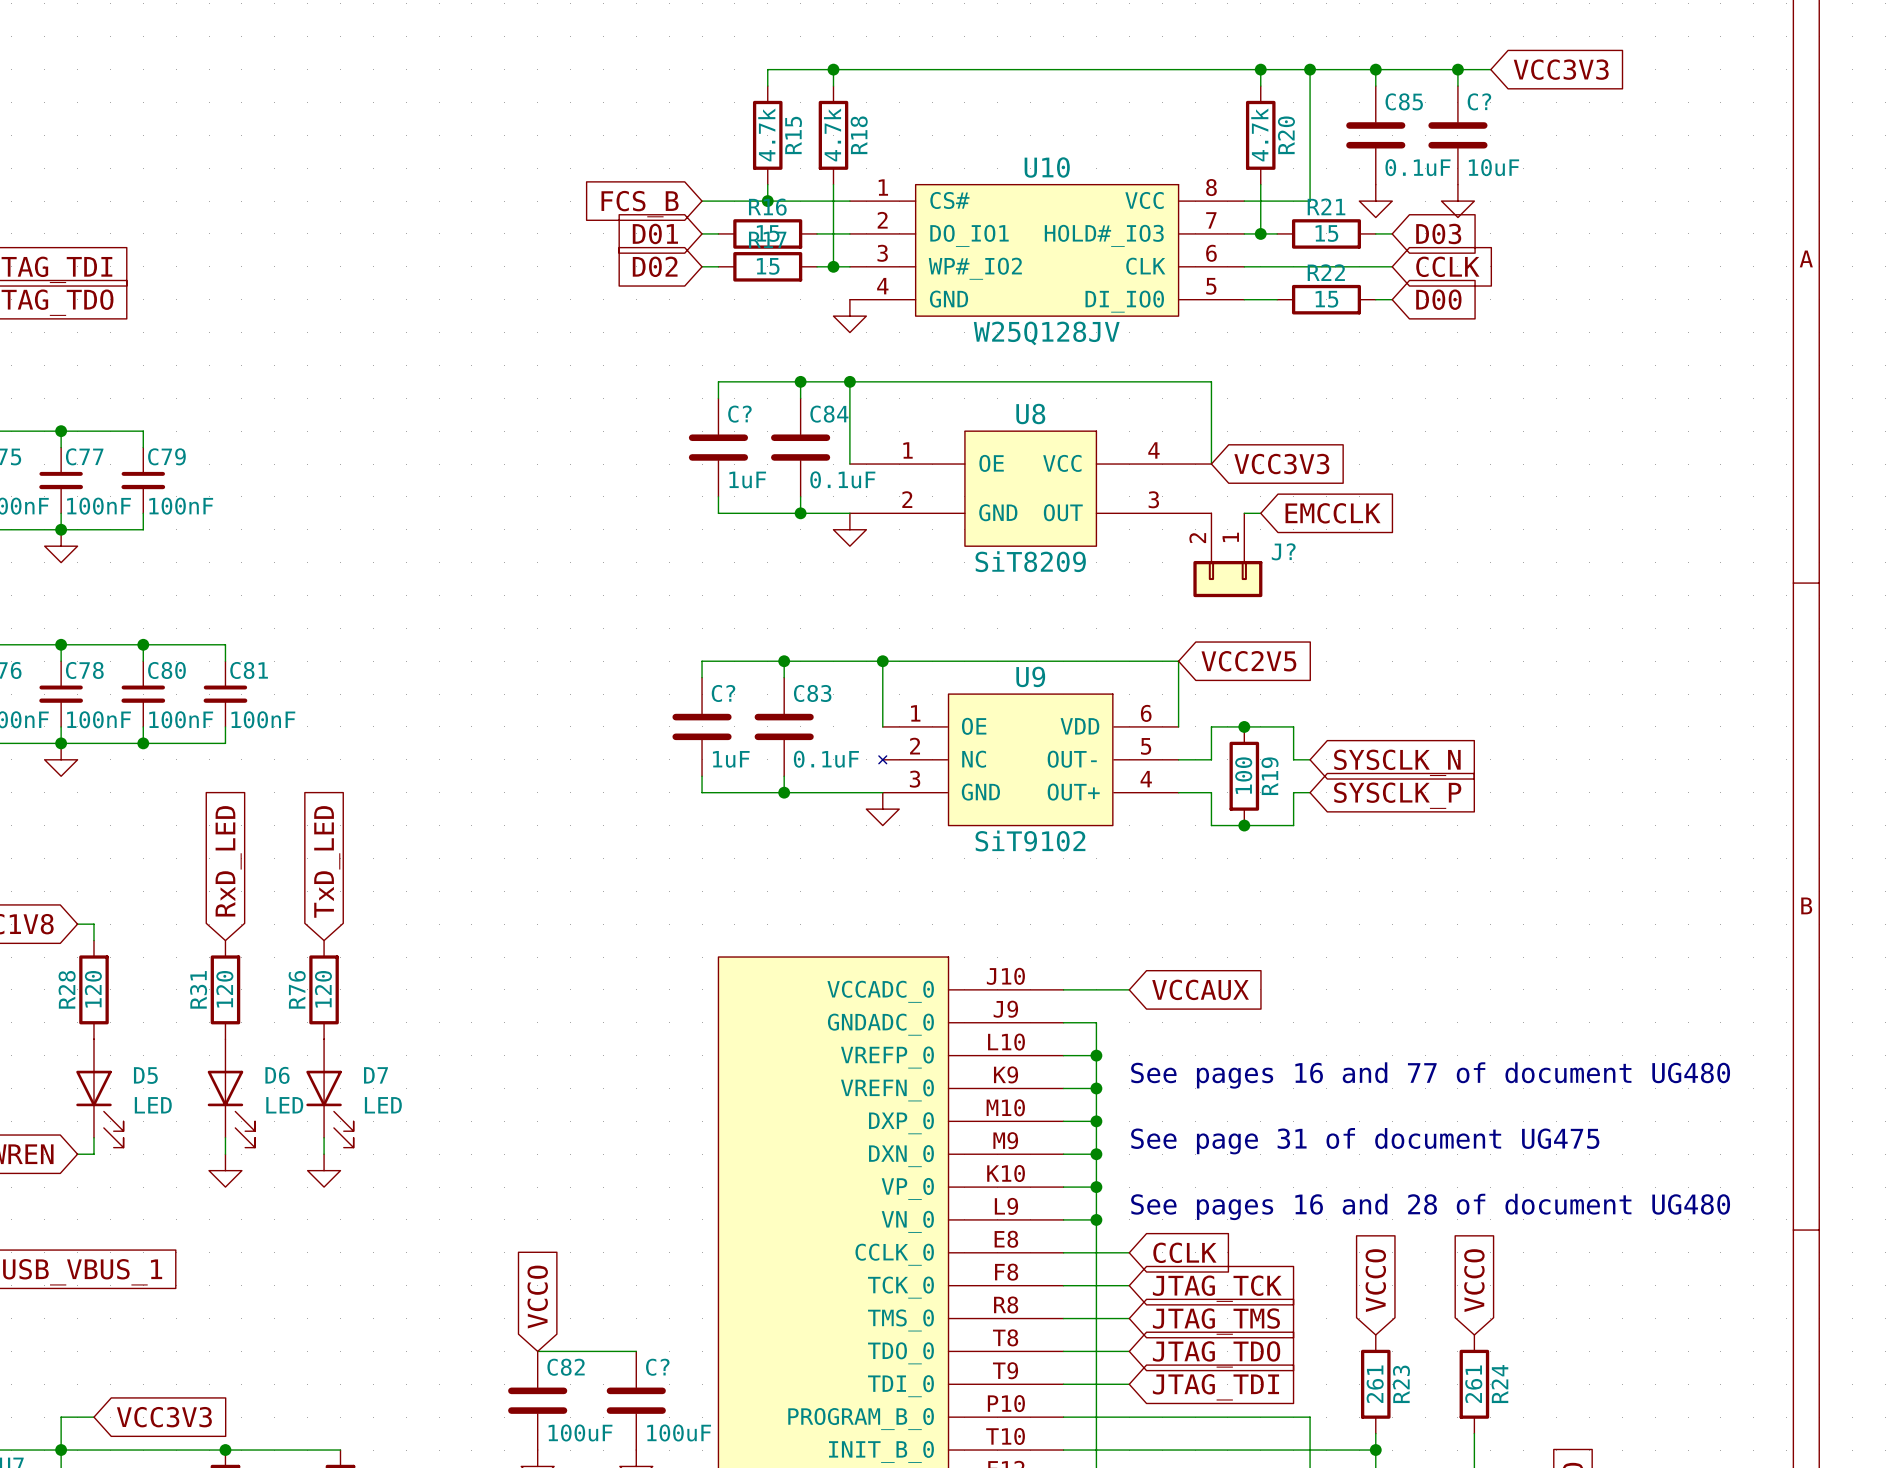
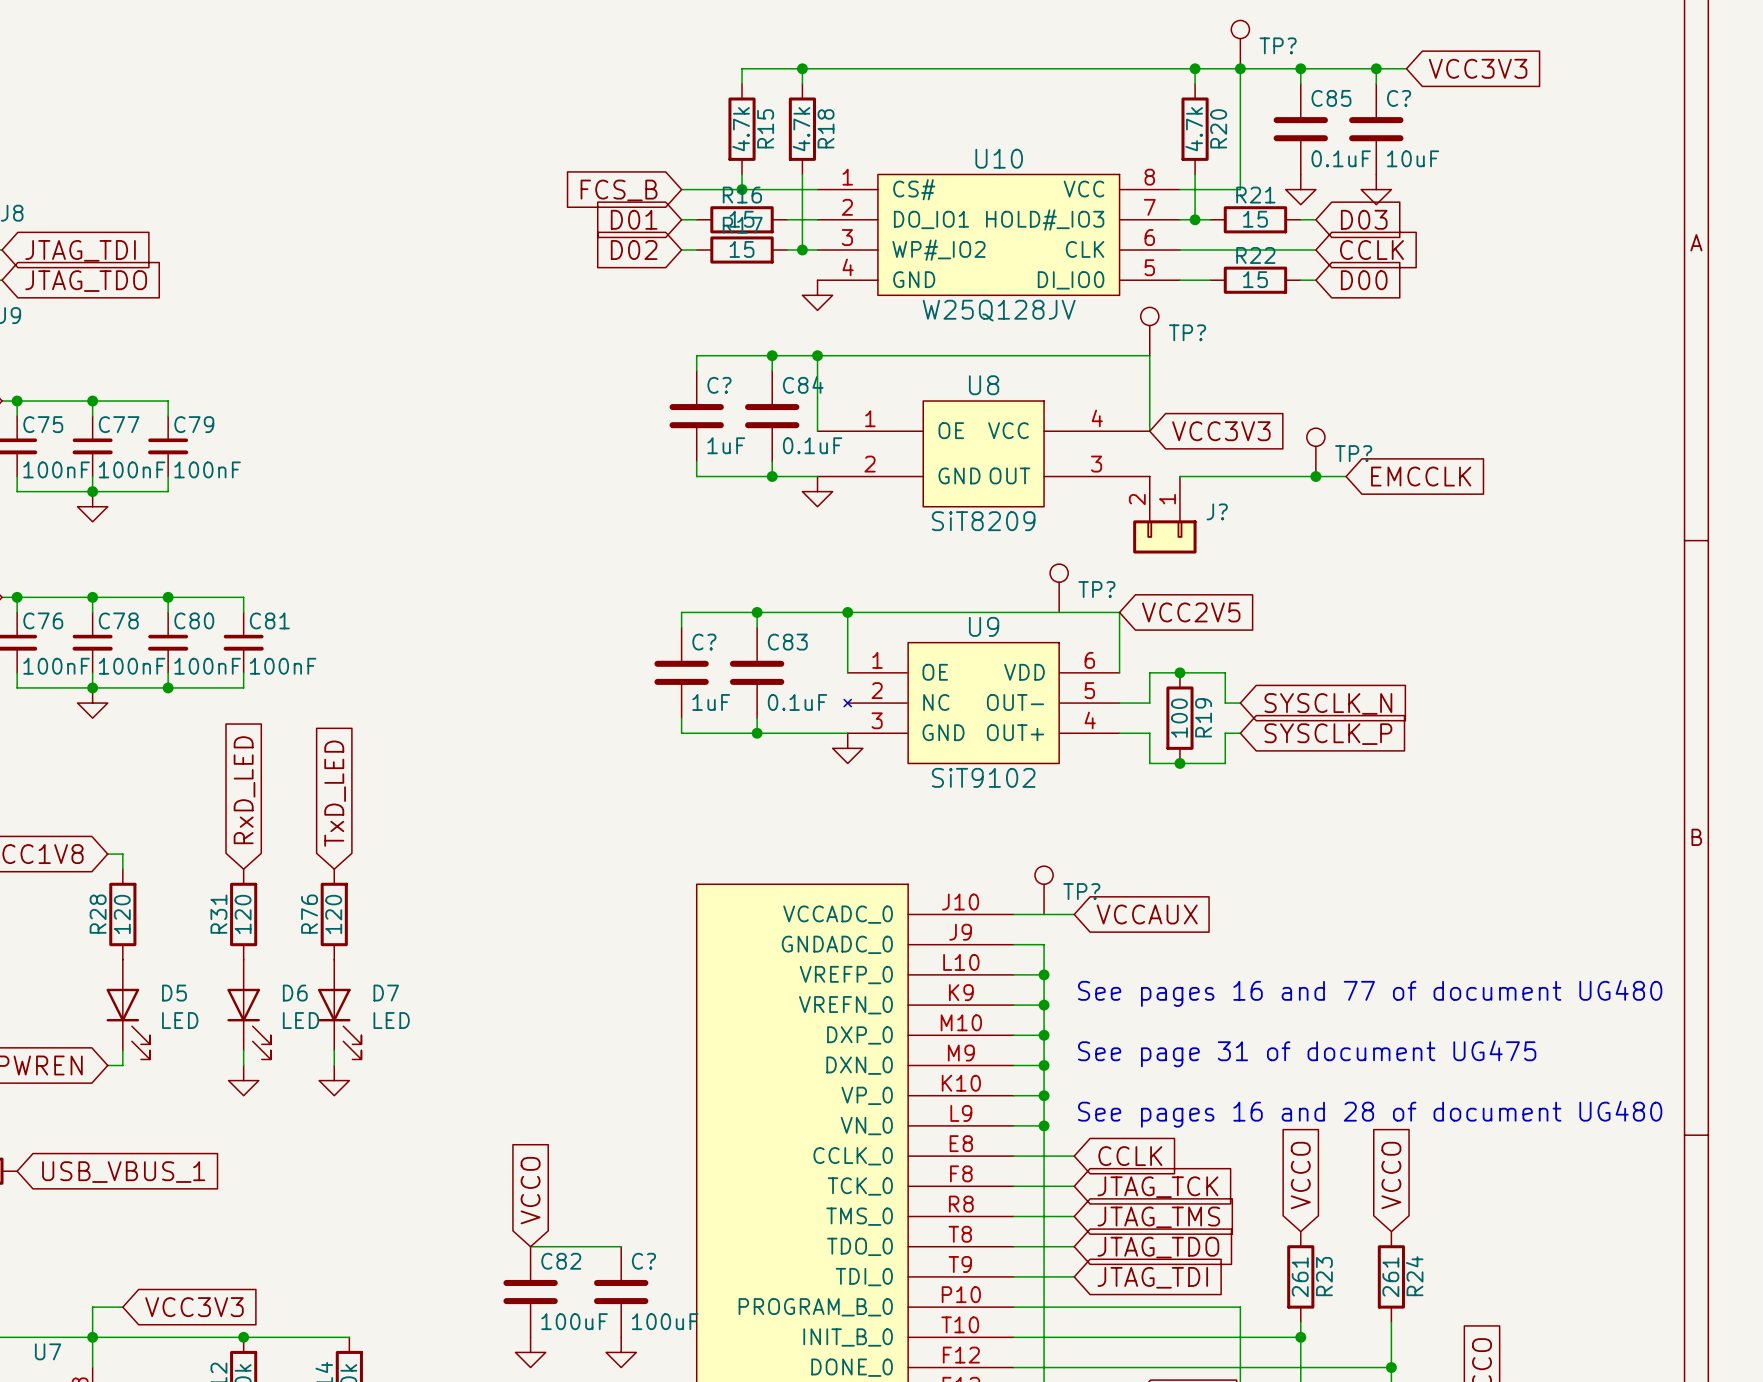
TP?: none -> (1240, 44)
TP?: none -> (1149, 331)
TP?: none -> (1315, 452)
wire: none -> (1195, 476) (1346, 476)
global label position: EMCCLK (1333, 513) -> EMCCLK (1421, 476)
junction: none -> (1315, 476)
TP?: none -> (1059, 588)
TP?: none -> (1044, 890)

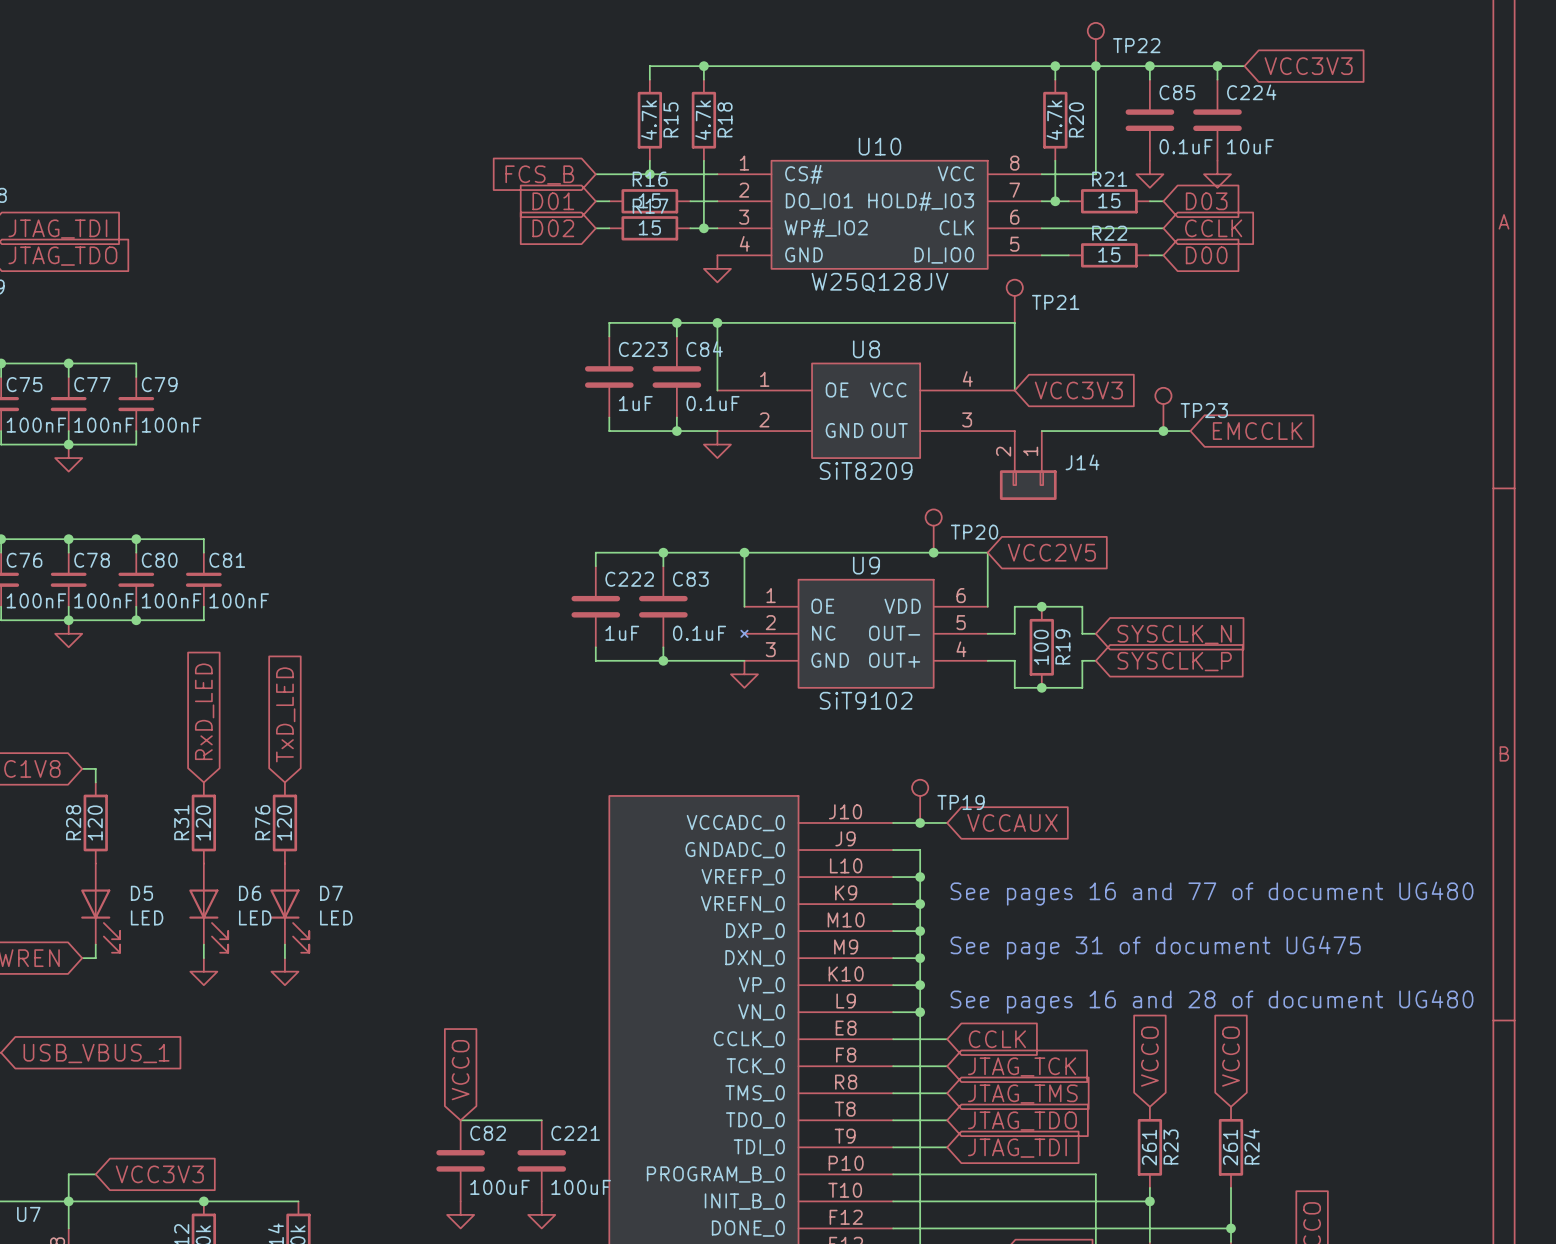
TP? name: TP? (1278, 45) -> TP22 (1136, 45)
C? name: C? (1399, 98) -> C224 (1251, 92)
TP? name: TP? (1187, 332) -> TP21 (1055, 302)
C? name: C? (719, 385) -> C223 (643, 349)
TP? name: TP? (1353, 453) -> TP23 (1204, 410)
J? name: J? (1217, 511) -> J14 (1082, 462)
TP? name: TP? (1096, 589) -> TP20 (974, 532)
junction: none -> (933, 552)
C? name: C? (704, 642) -> C222 (629, 579)
TP? name: TP? (1081, 891) -> TP19 (961, 802)
junction: none -> (920, 822)
C? name: C? (643, 1261) -> C221 (575, 1133)

